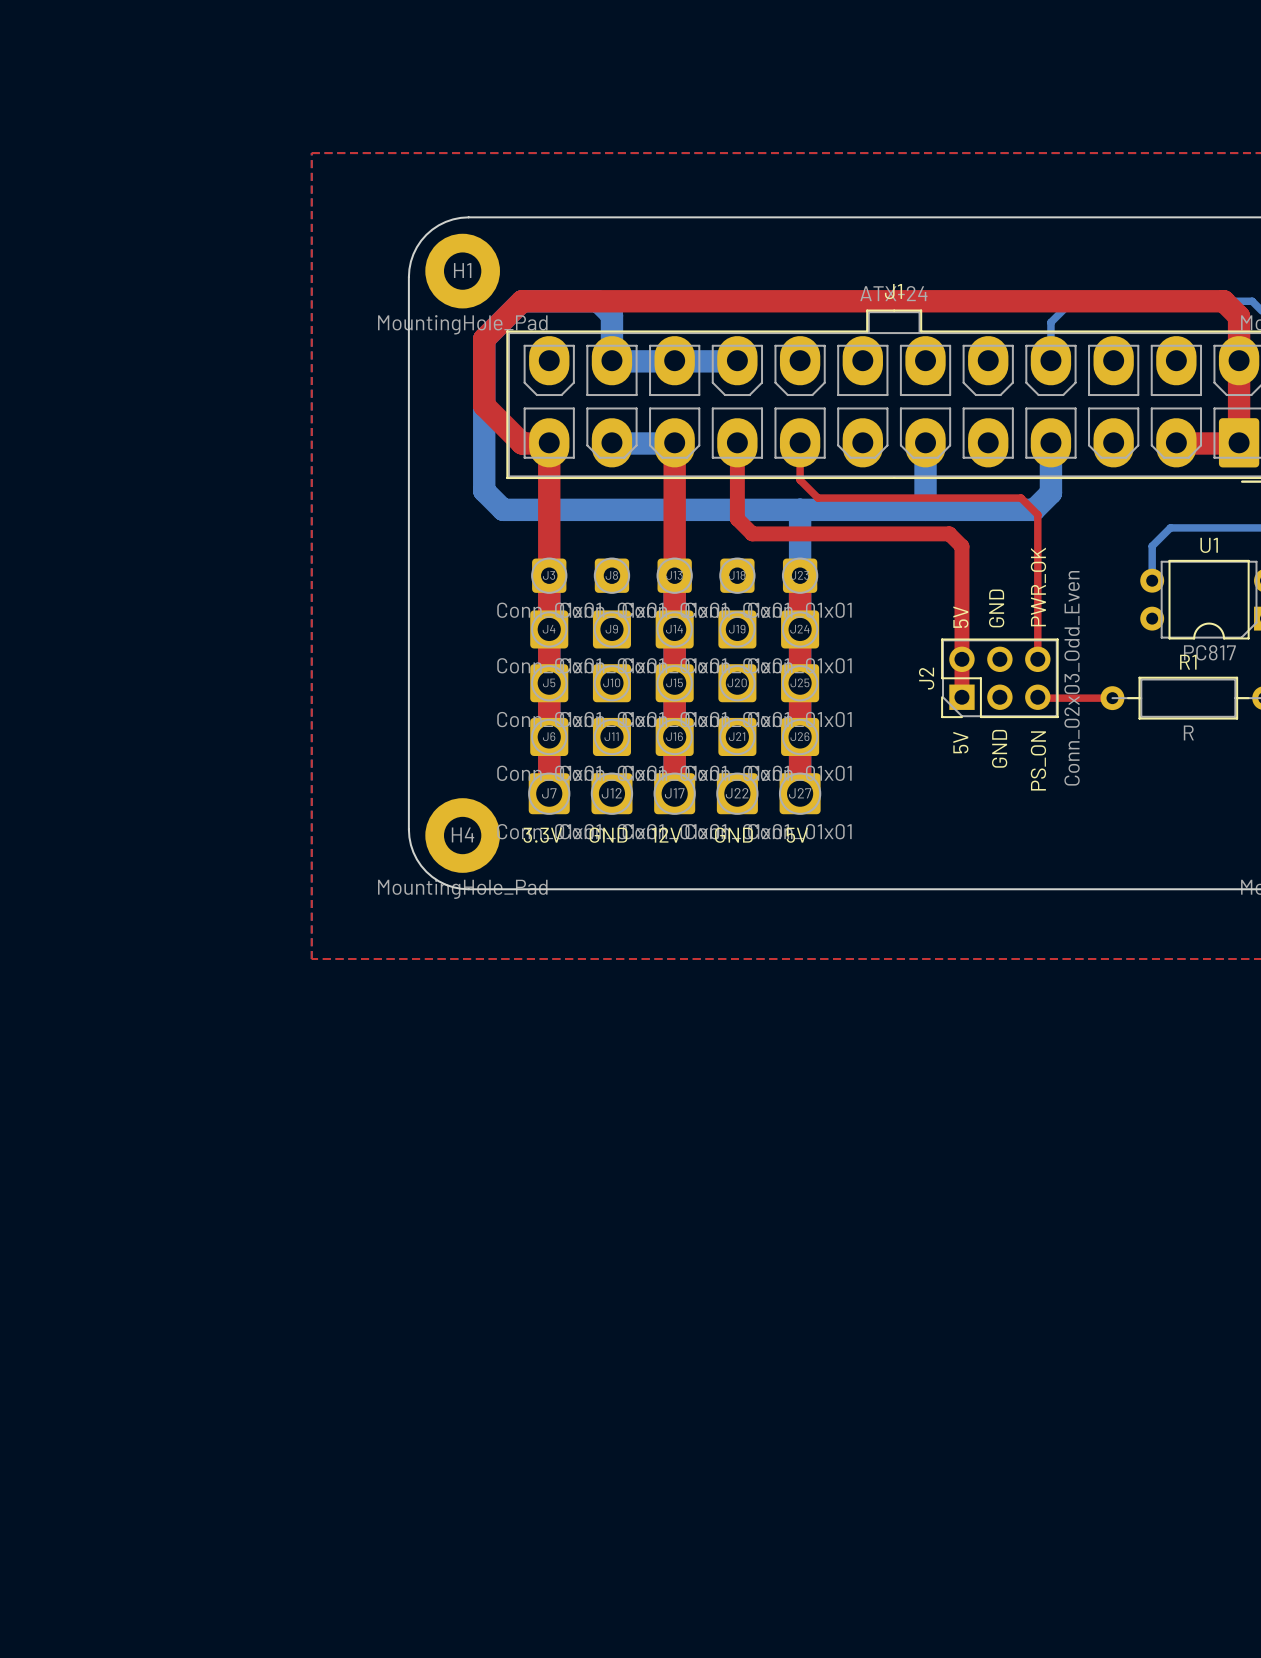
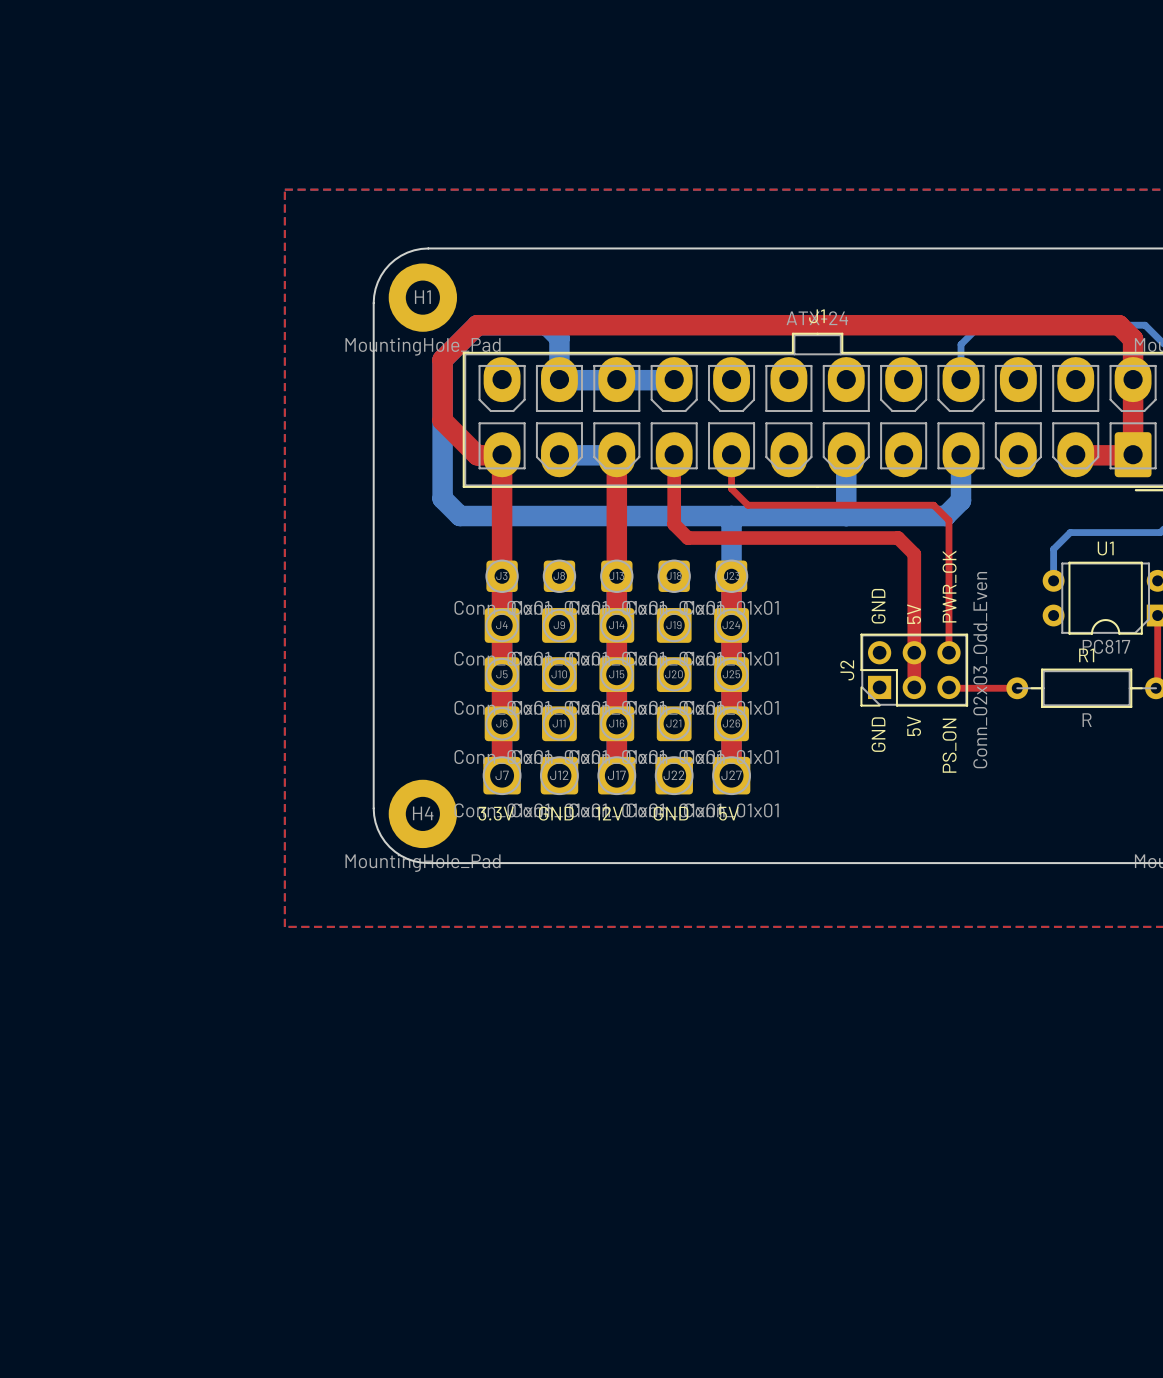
top track: (949, 533) (961, 546) (961, 697) -> (868, 538) (898, 538) (914, 554) (914, 687)
J2 text position: GND (996, 608) -> GND (878, 606)
J2 text position: 5V (960, 617) -> 5V (914, 614)
J2 text position: 5V (960, 742) -> 5V (914, 726)
J2 text position: GND (999, 748) -> GND (878, 734)

